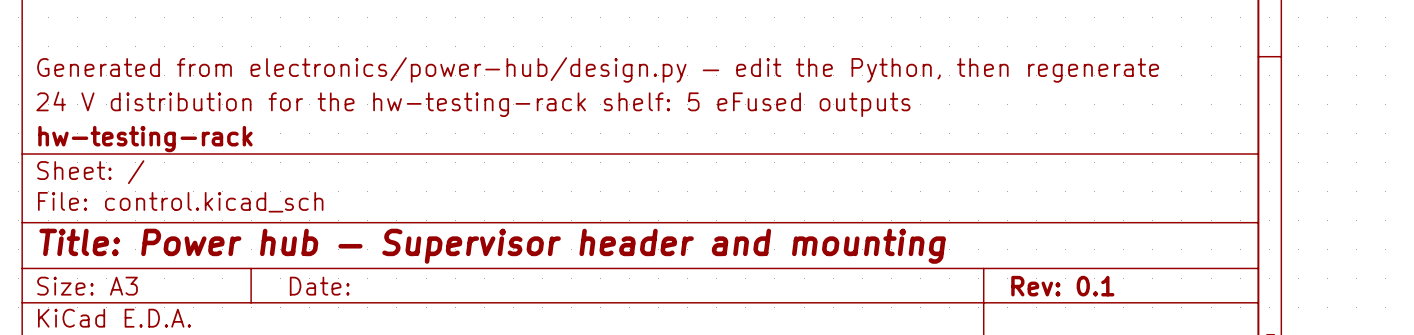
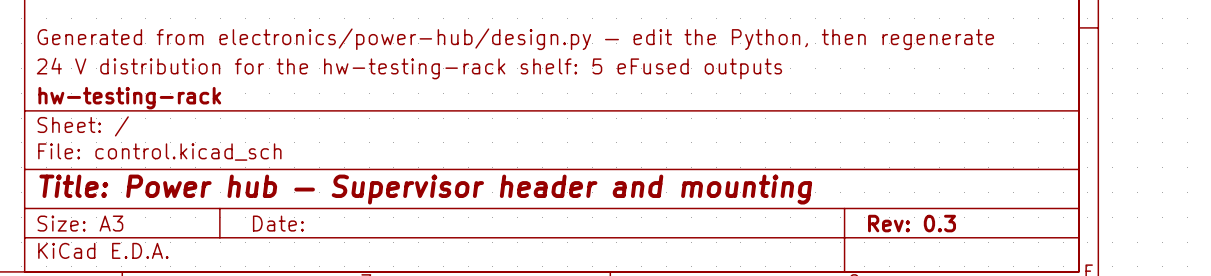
title block: Rev: 0.1 (1062, 286) -> Rev: 0.3 (912, 223)

